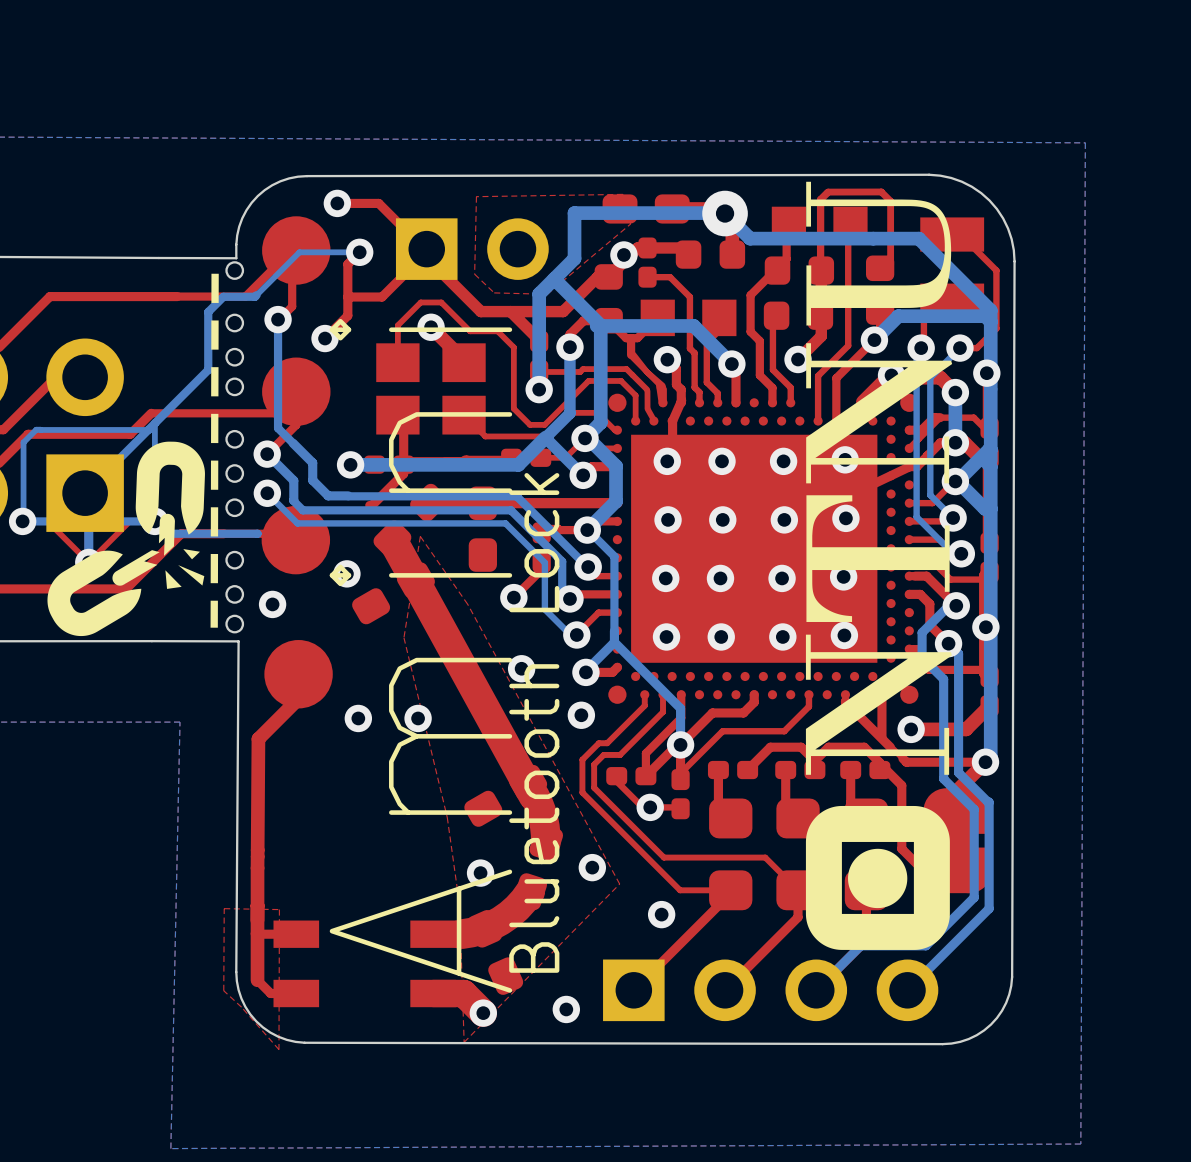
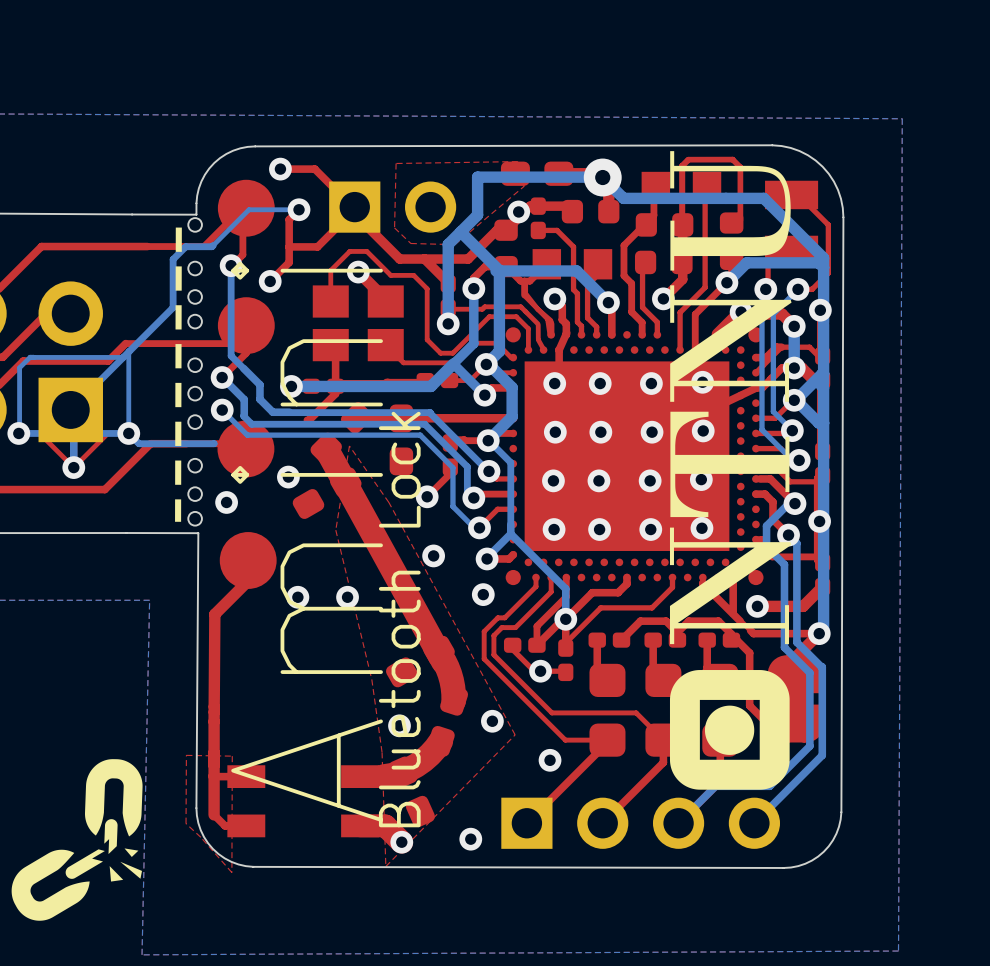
drawing position: (170, 488) -> (113, 797)
drawing position: (166, 534) -> (110, 836)
drawing position: (191, 554) -> (131, 852)
drawing position: (136, 567) -> (85, 864)
drawing position: (191, 575) -> (131, 870)
drawing position: (173, 579) -> (116, 873)
drawing position: (94, 593) -> (50, 885)
text position: Amini (420, 655) -> Amini (307, 541)
text position: Bluetooth Lock (534, 722) -> Bluetooth Lock (399, 619)

